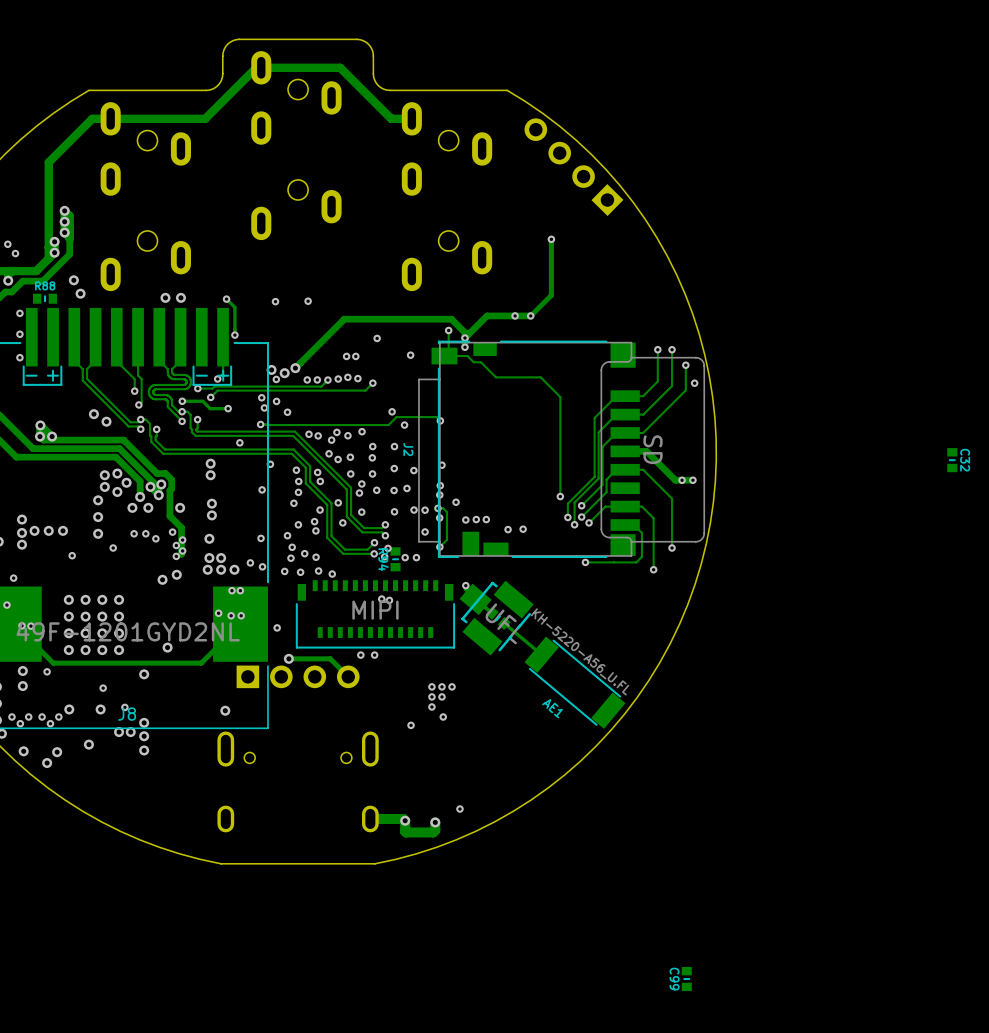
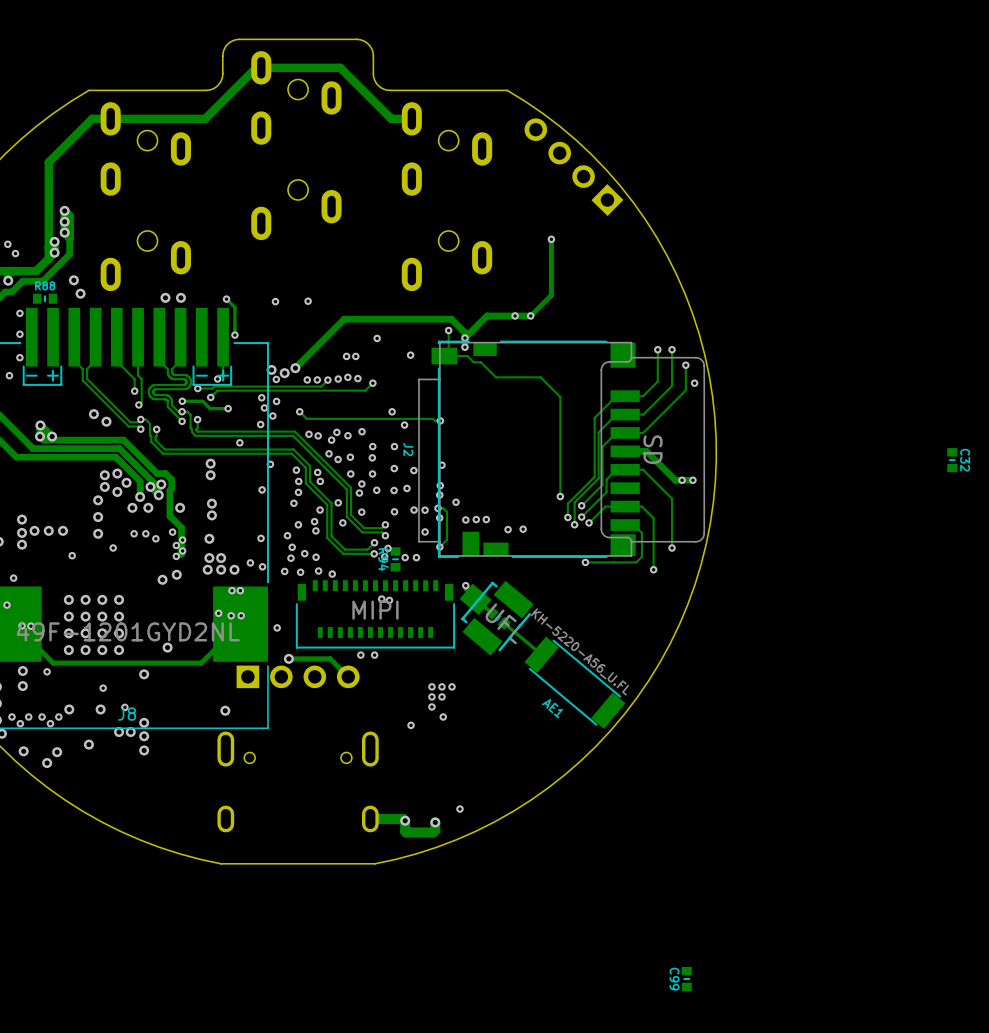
via: none -> (9, 375)
via: none -> (299, 411)
via: (287, 412) -> none
via: none -> (272, 415)
track: (440, 420) (436, 417) (396, 417) (388, 425) (260, 424) -> (440, 420) (433, 418) (306, 418) (299, 411)

